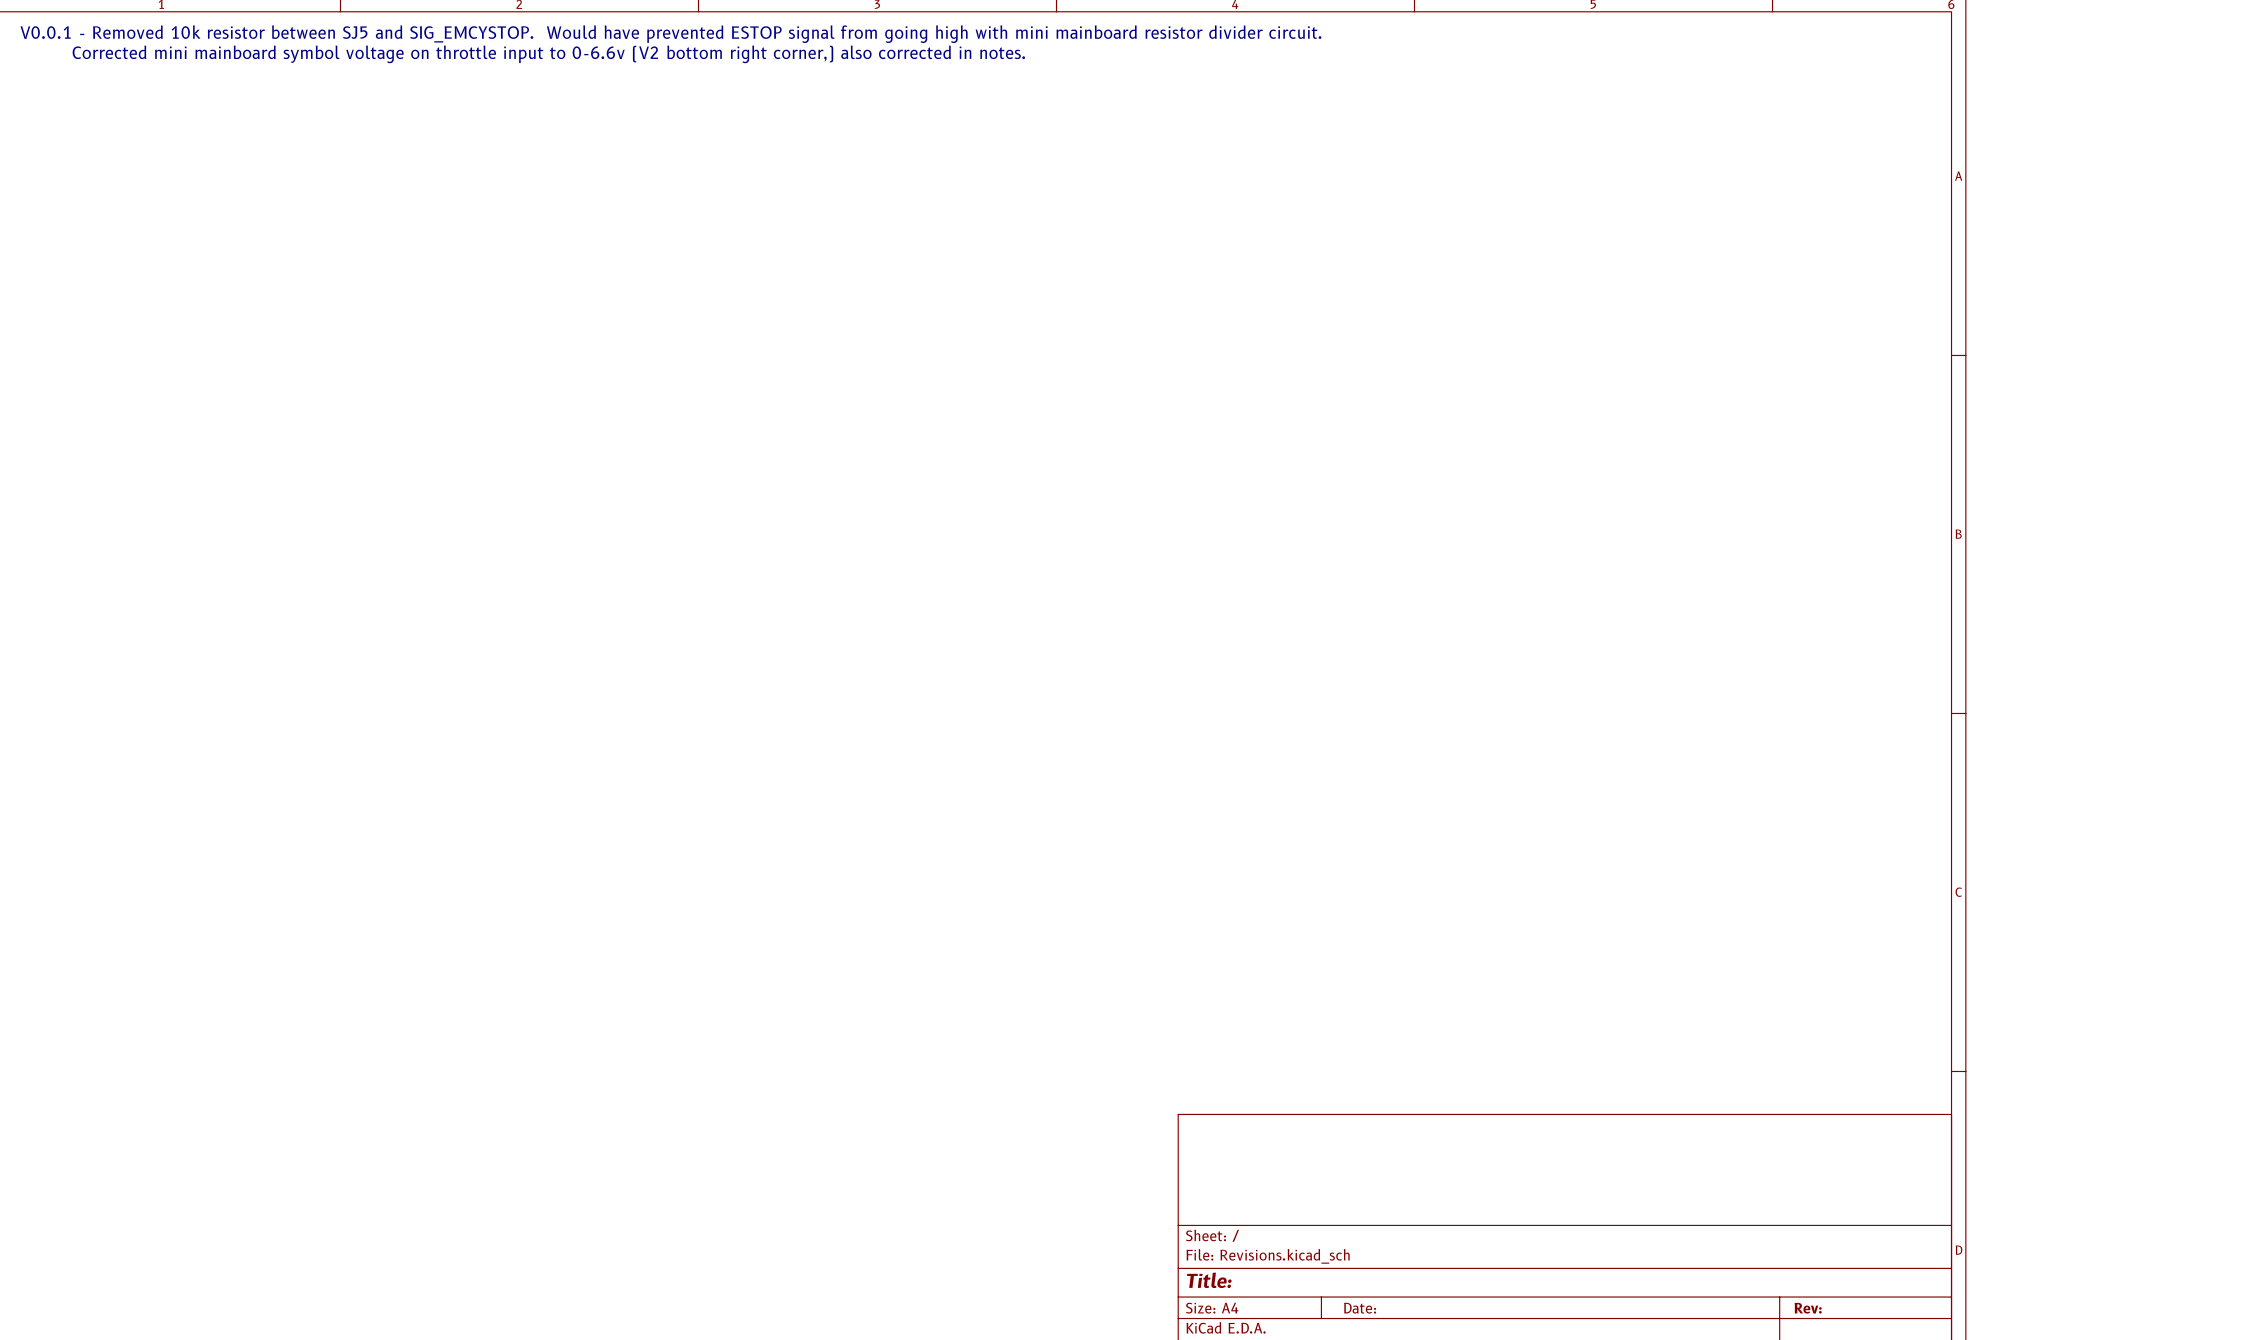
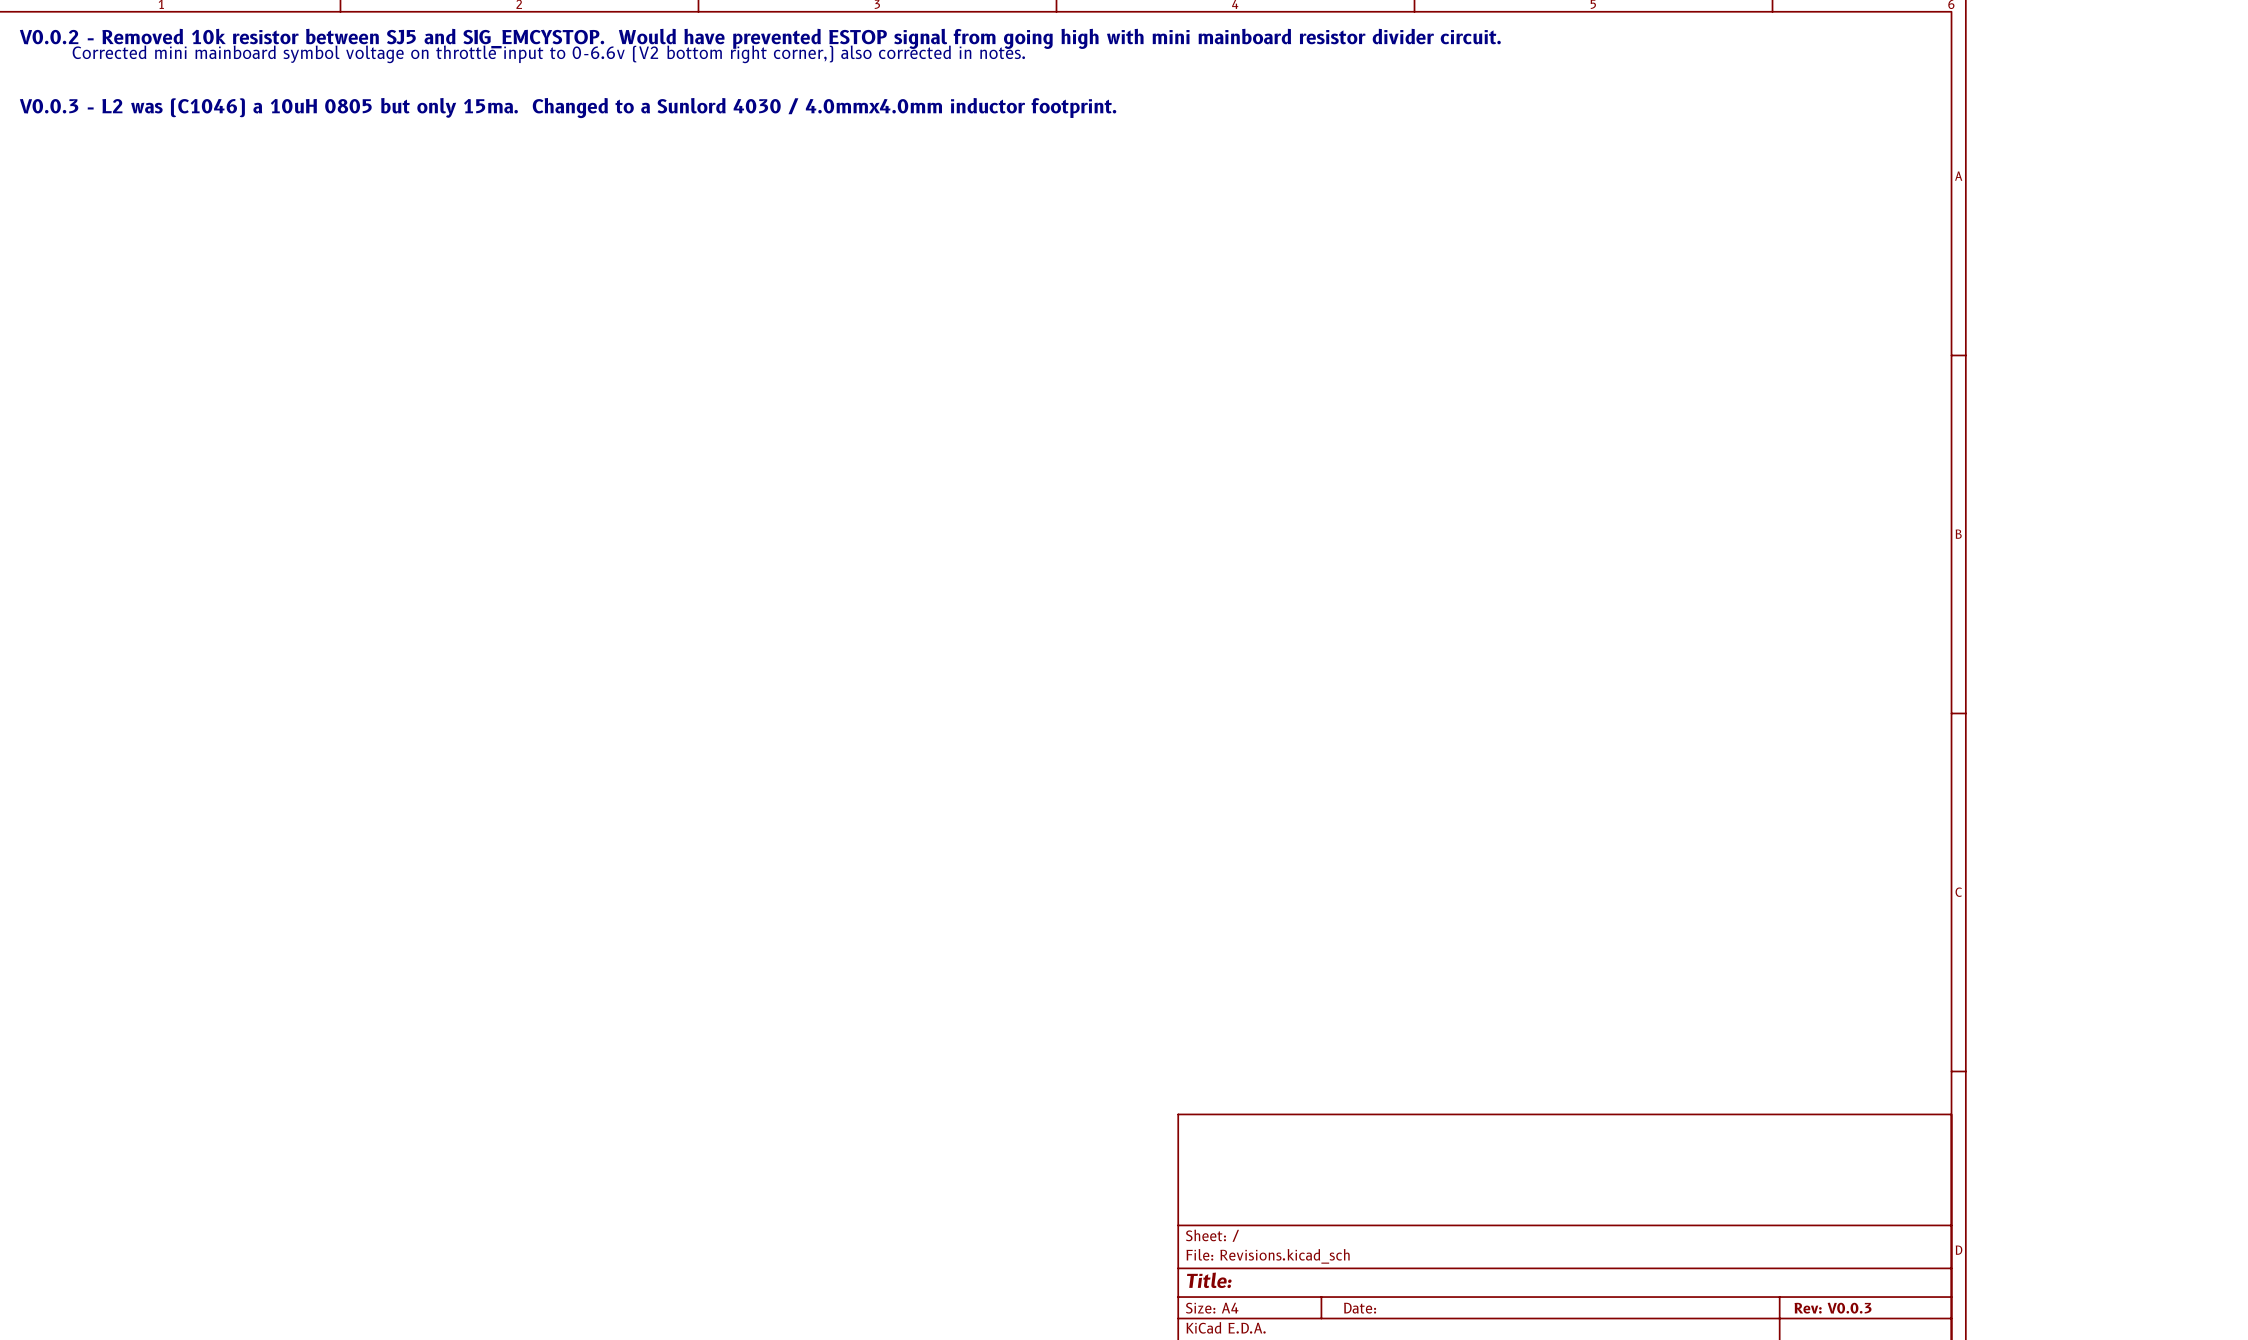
text: V0.0.1 - Removed 10k resistor between SJ5 and SIG_EMCYSTOP. Would have prevented ESTOP signal from going high with mini mainboard resistor divider circuit. (670, 34) -> V0.0.2 - Removed 10k resistor between SJ5 and SIG_EMCYSTOP. Would have prevented ESTOP signal from going high with mini mainboard resistor divider circuit. (760, 38)
text: none -> V0.0.3 - L2 was (C1046) a 10uH 0805 but only 15ma. Changed to a Sunlord 4030 / 4.0mmx4.0mm inductor footprint. (568, 108)
title block: Rev: (1808, 1308) -> Rev: V0.0.3 (1833, 1308)

